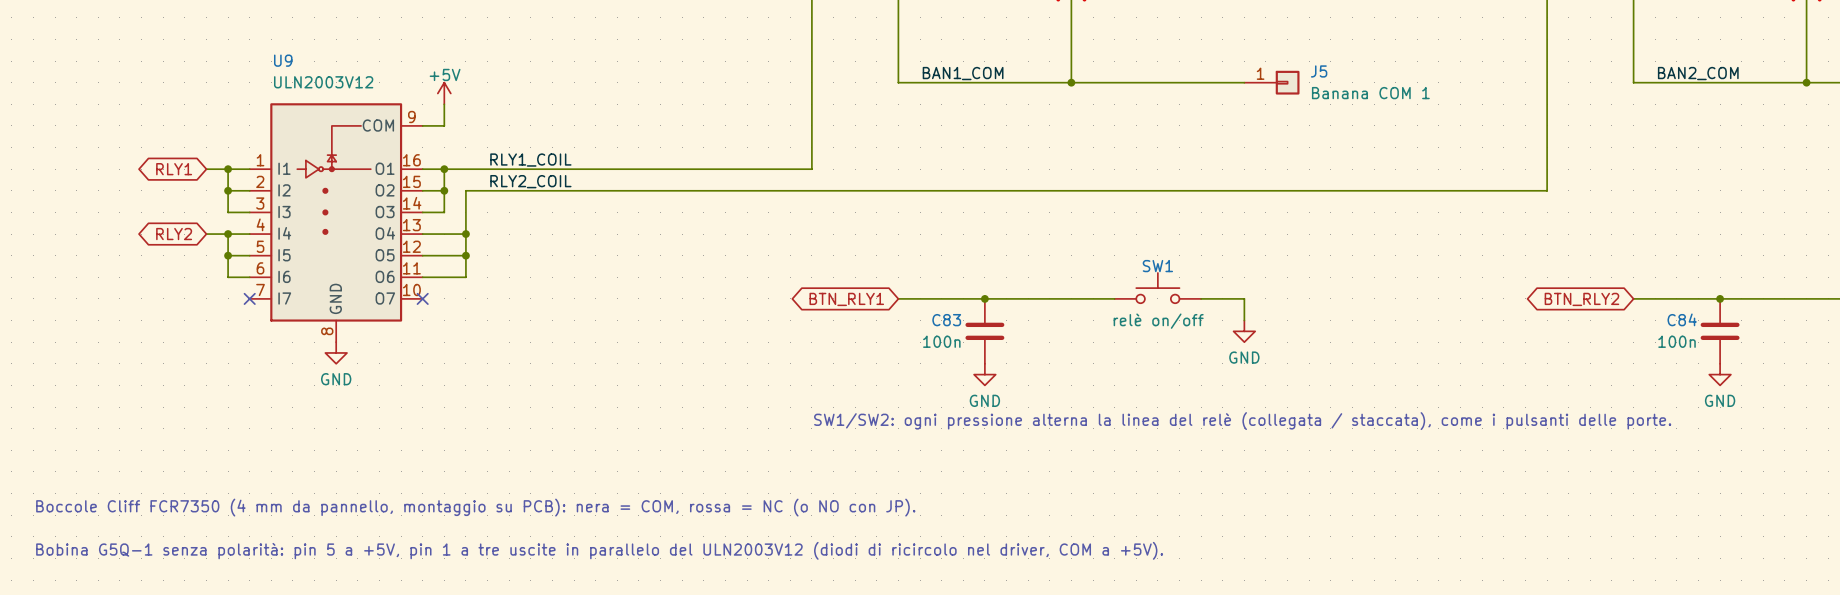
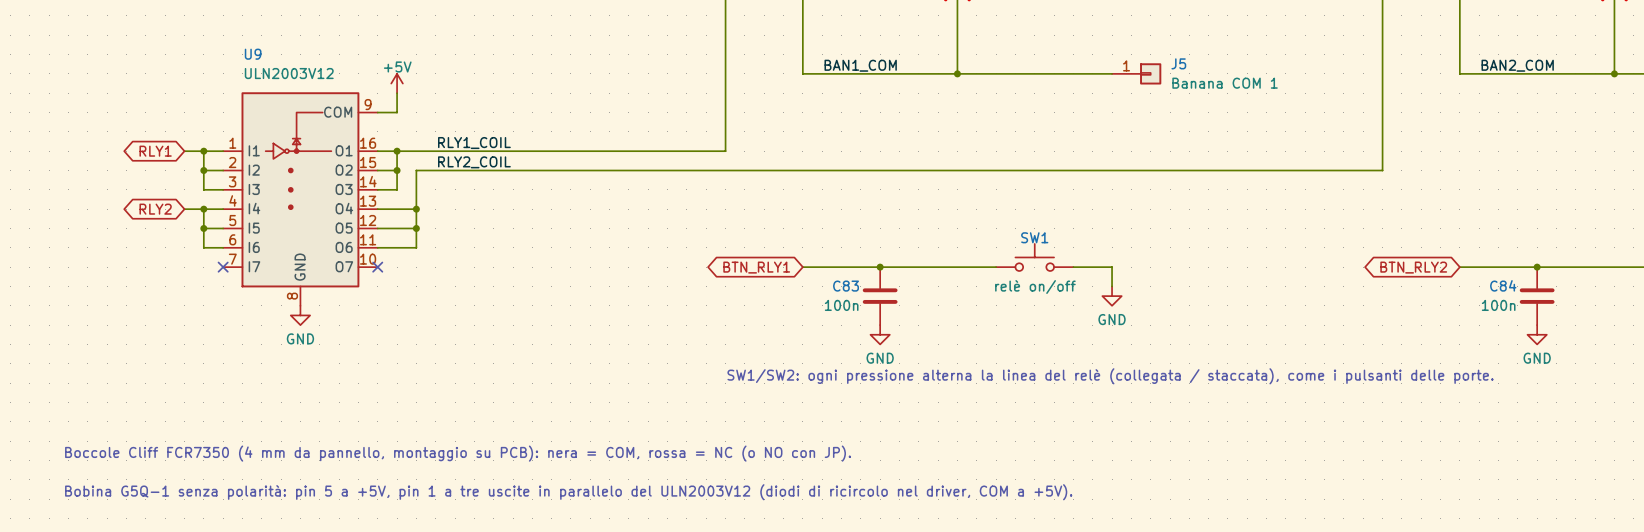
text position: Boccole Cliff FCR7350 (4 mm da pannello, montaggio su PCB): nera = COM, rossa = NC (o NO con JP). (475, 507) -> Boccole Cliff FCR7350 (4 mm da pannello, montaggio su PCB): nera = COM, rossa = NC (o NO con JP). (458, 453)
text position: Bobina G5Q-1 senza polarità: pin 5 a +5V, pin 1 a tre uscite in parallelo del ULN2003V12 (diodi di ricircolo nel driver, COM a +5V). (599, 550) -> Bobina G5Q-1 senza polarità: pin 5 a +5V, pin 1 a tre uscite in parallelo del ULN2003V12 (diodi di ricircolo nel driver, COM a +5V). (568, 492)

